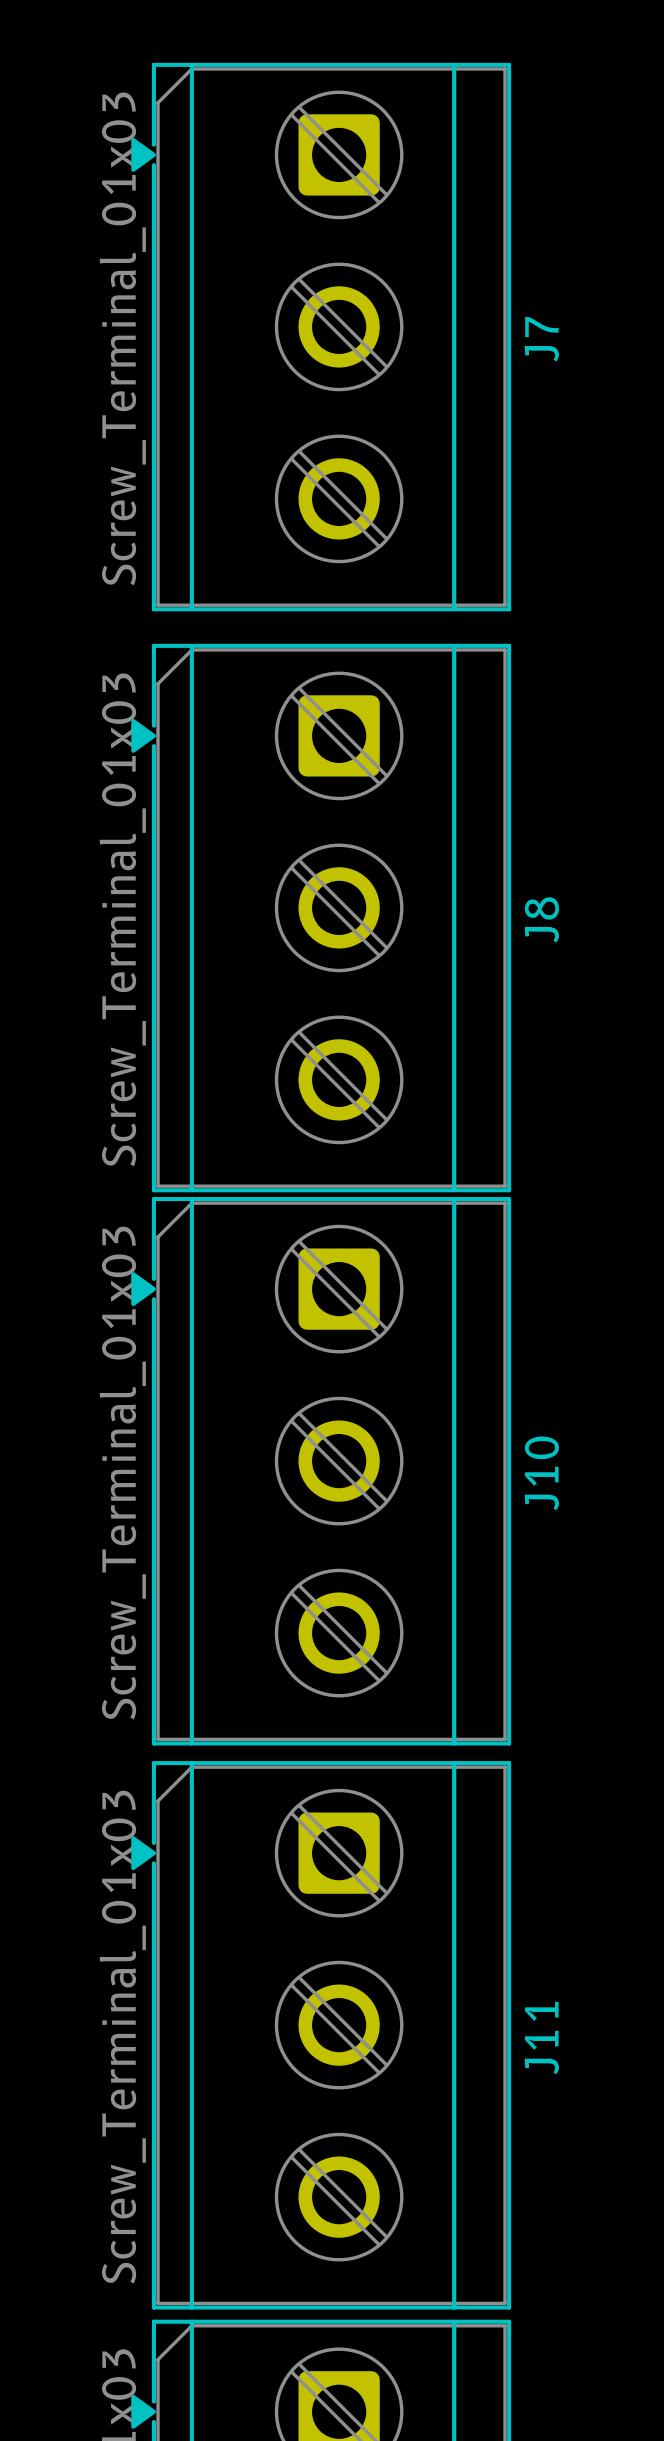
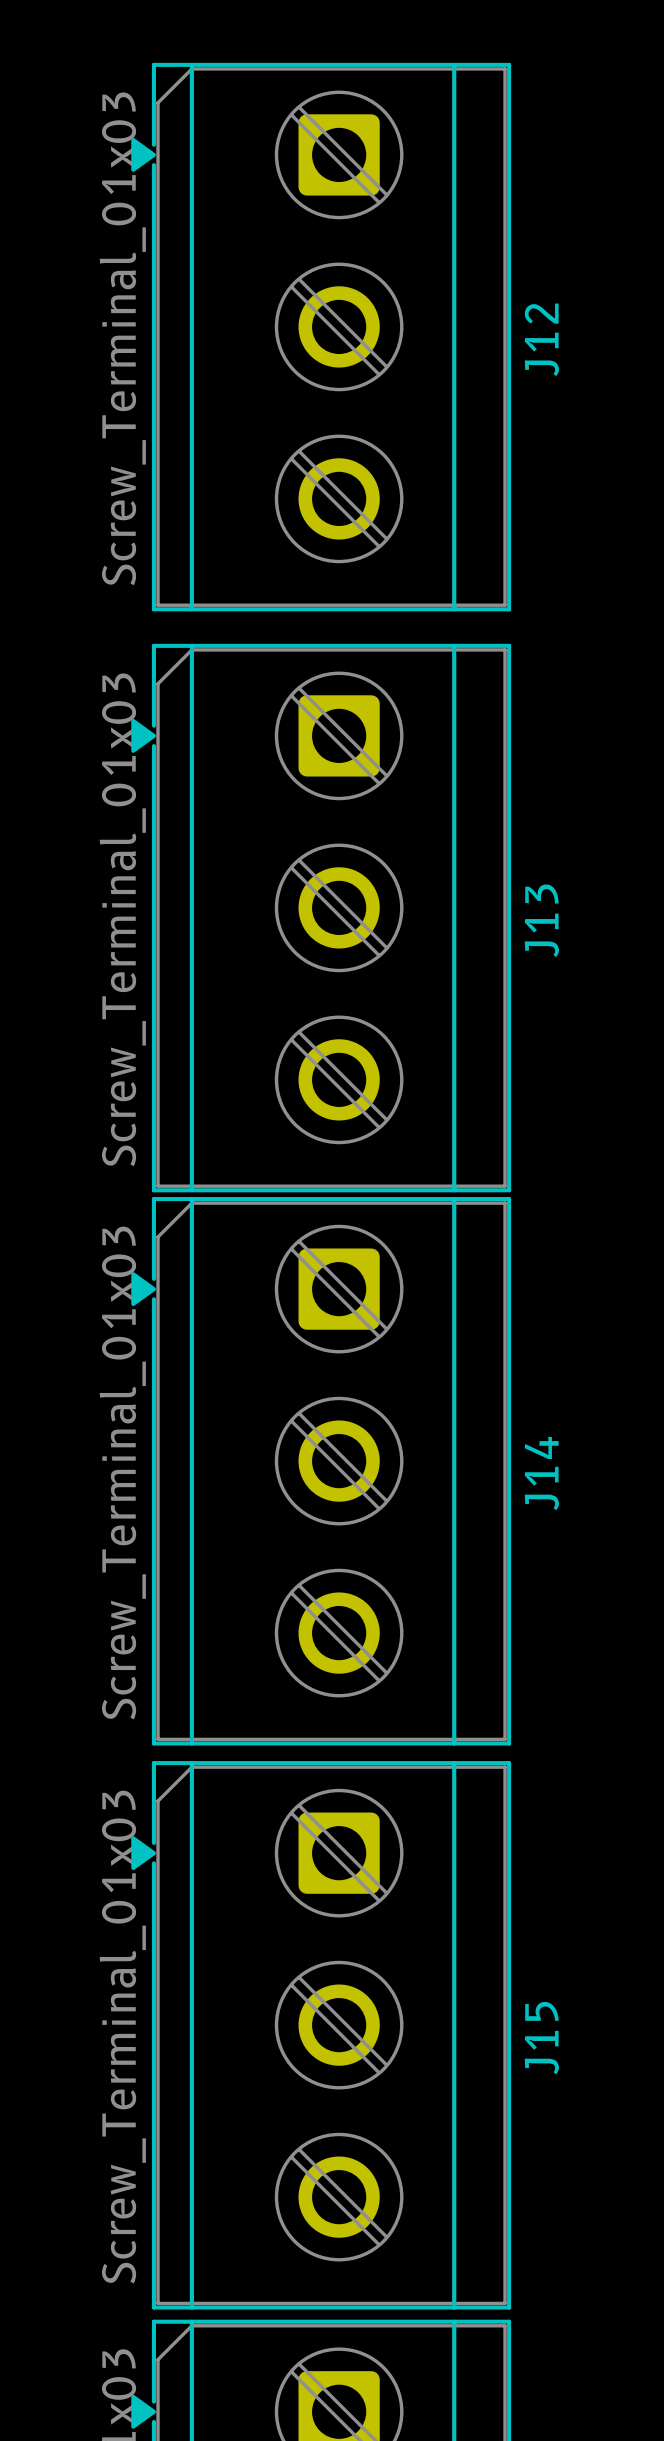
J7 name: J7 (541, 339) -> J12 (541, 339)
J8 name: J8 (541, 919) -> J13 (541, 920)
J10 name: J10 (541, 1473) -> J14 (541, 1473)
J11 name: J11 (541, 2038) -> J15 (541, 2038)

